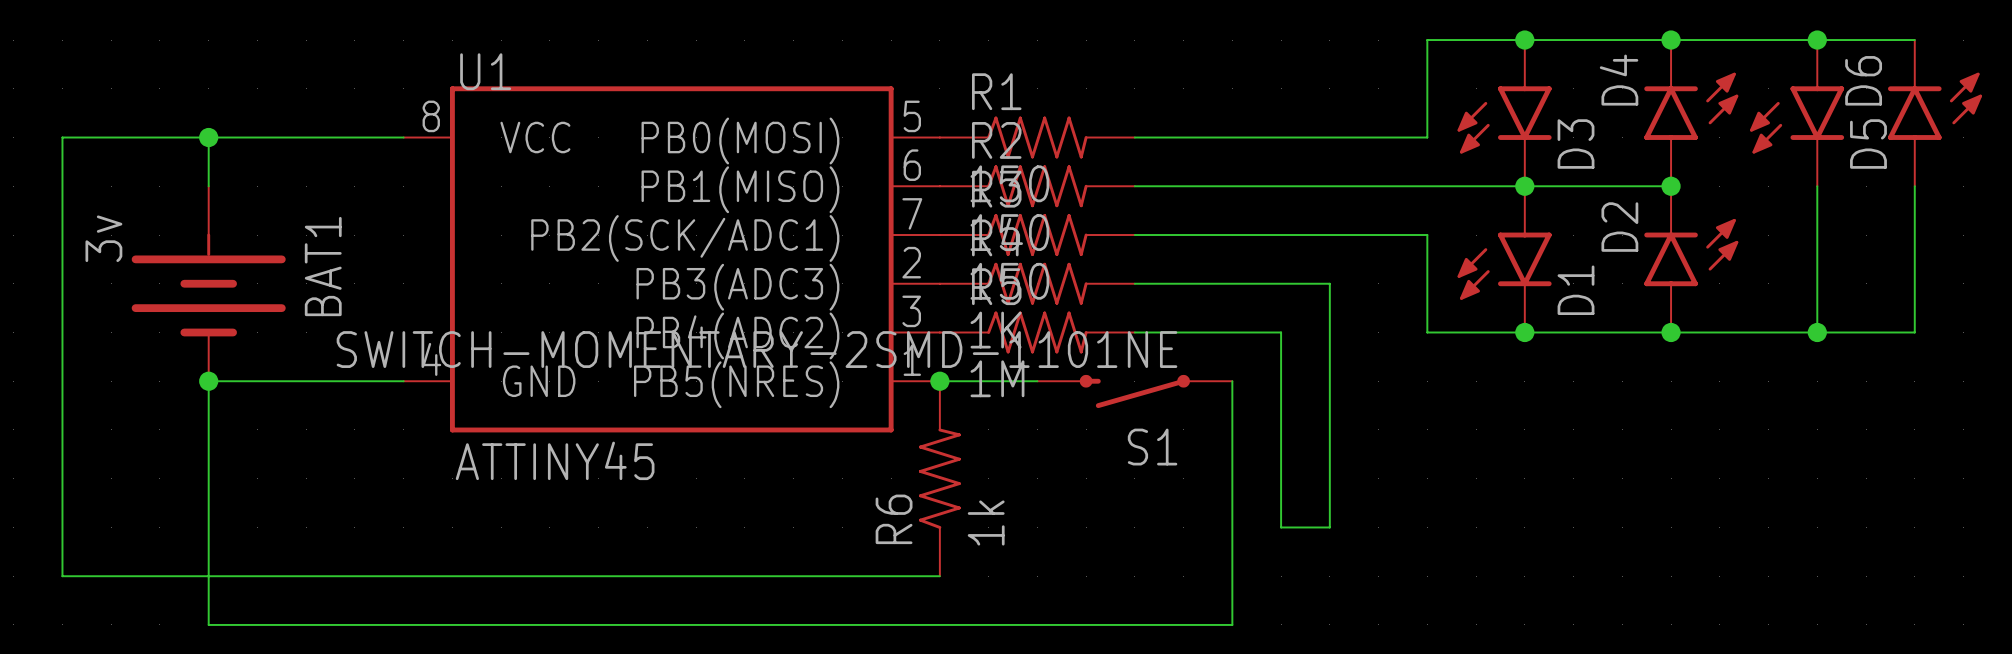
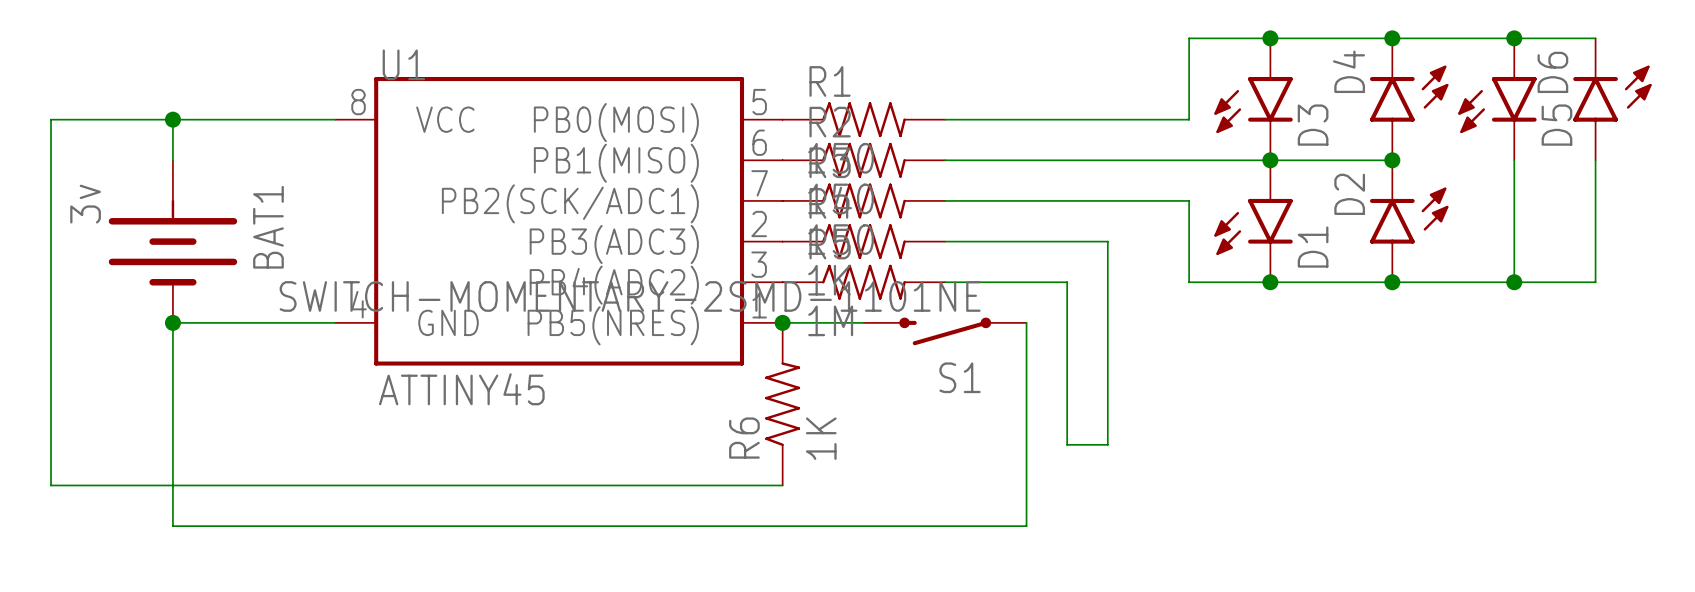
R6 value: 1k (986, 522) -> 1K (821, 438)

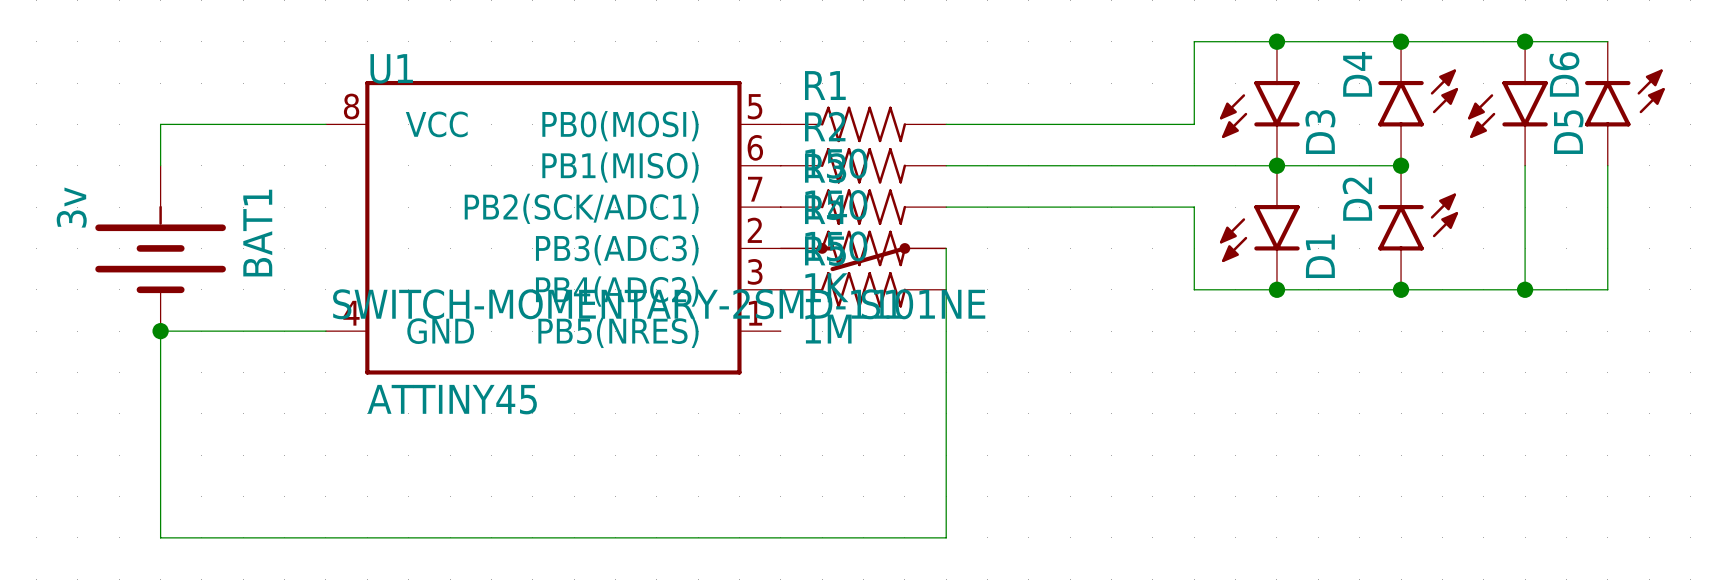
wire: (172, 119) (51, 119) (51, 485) (782, 485) -> none
junction: (172, 119) -> none
wire: (945, 241) (1107, 241) (1107, 444) (1067, 444) (1067, 282) (945, 282) -> none
wire: (782, 322) (863, 322) -> none
junction: (782, 322) -> none
wire: (1026, 322) (1026, 526) (945, 526) -> (946, 248) (946, 537)
S1 position: (945, 331) -> (863, 257)
R6: 1K (782, 404) -> none

